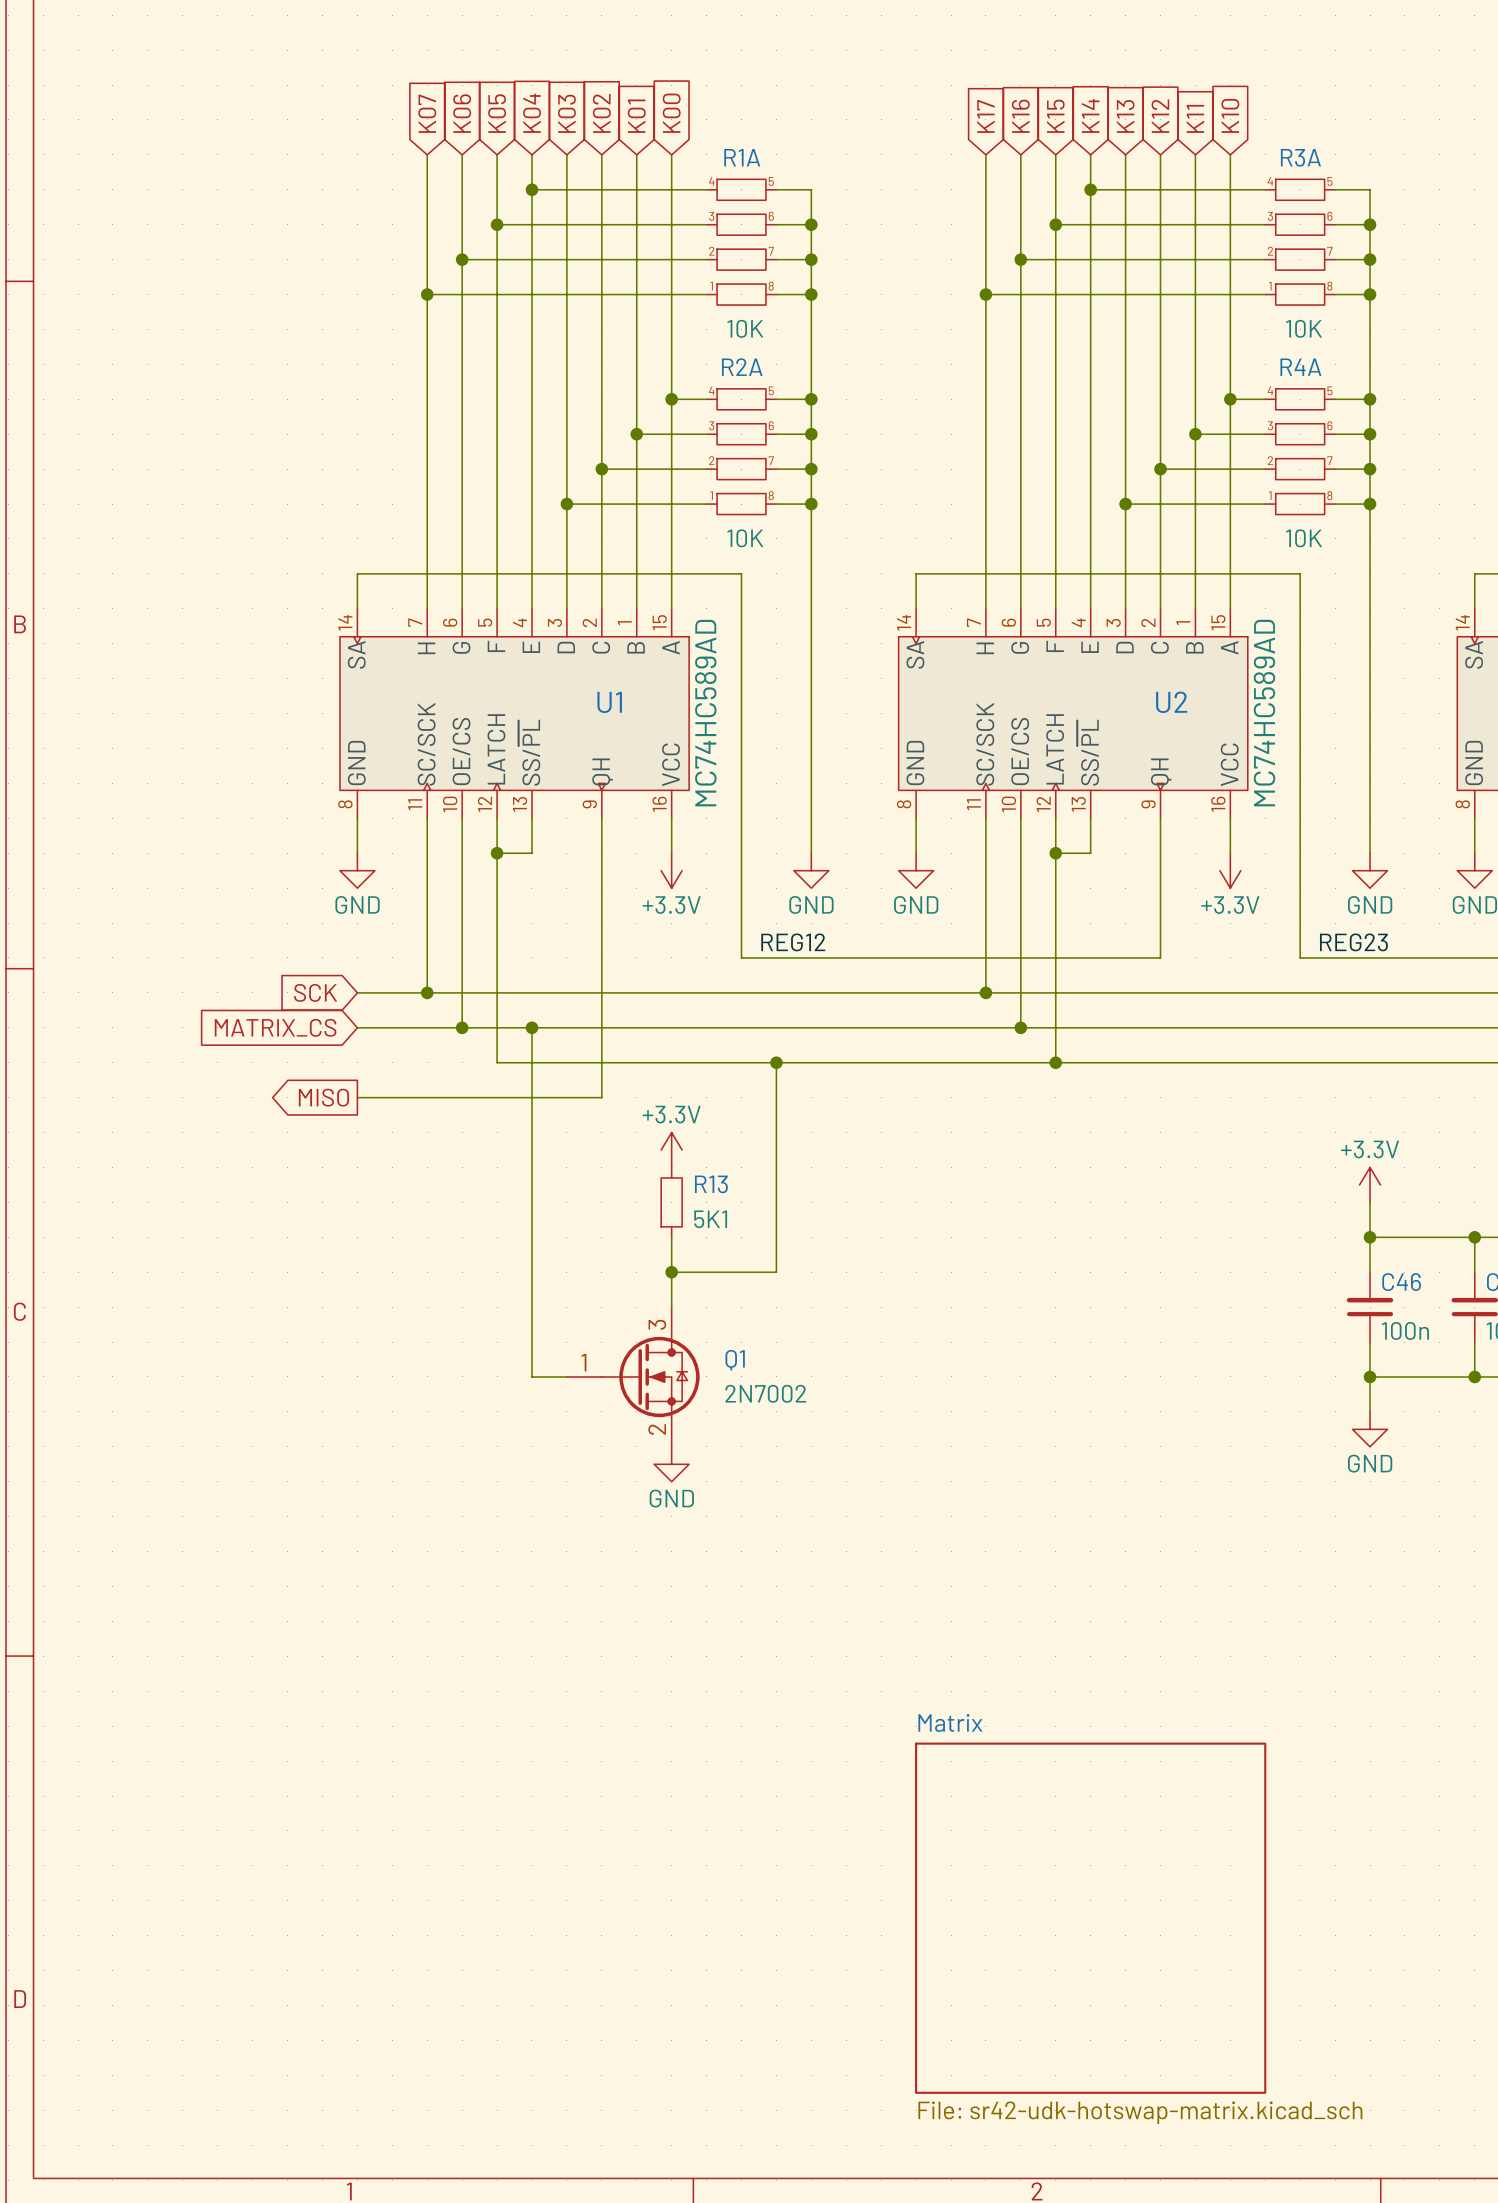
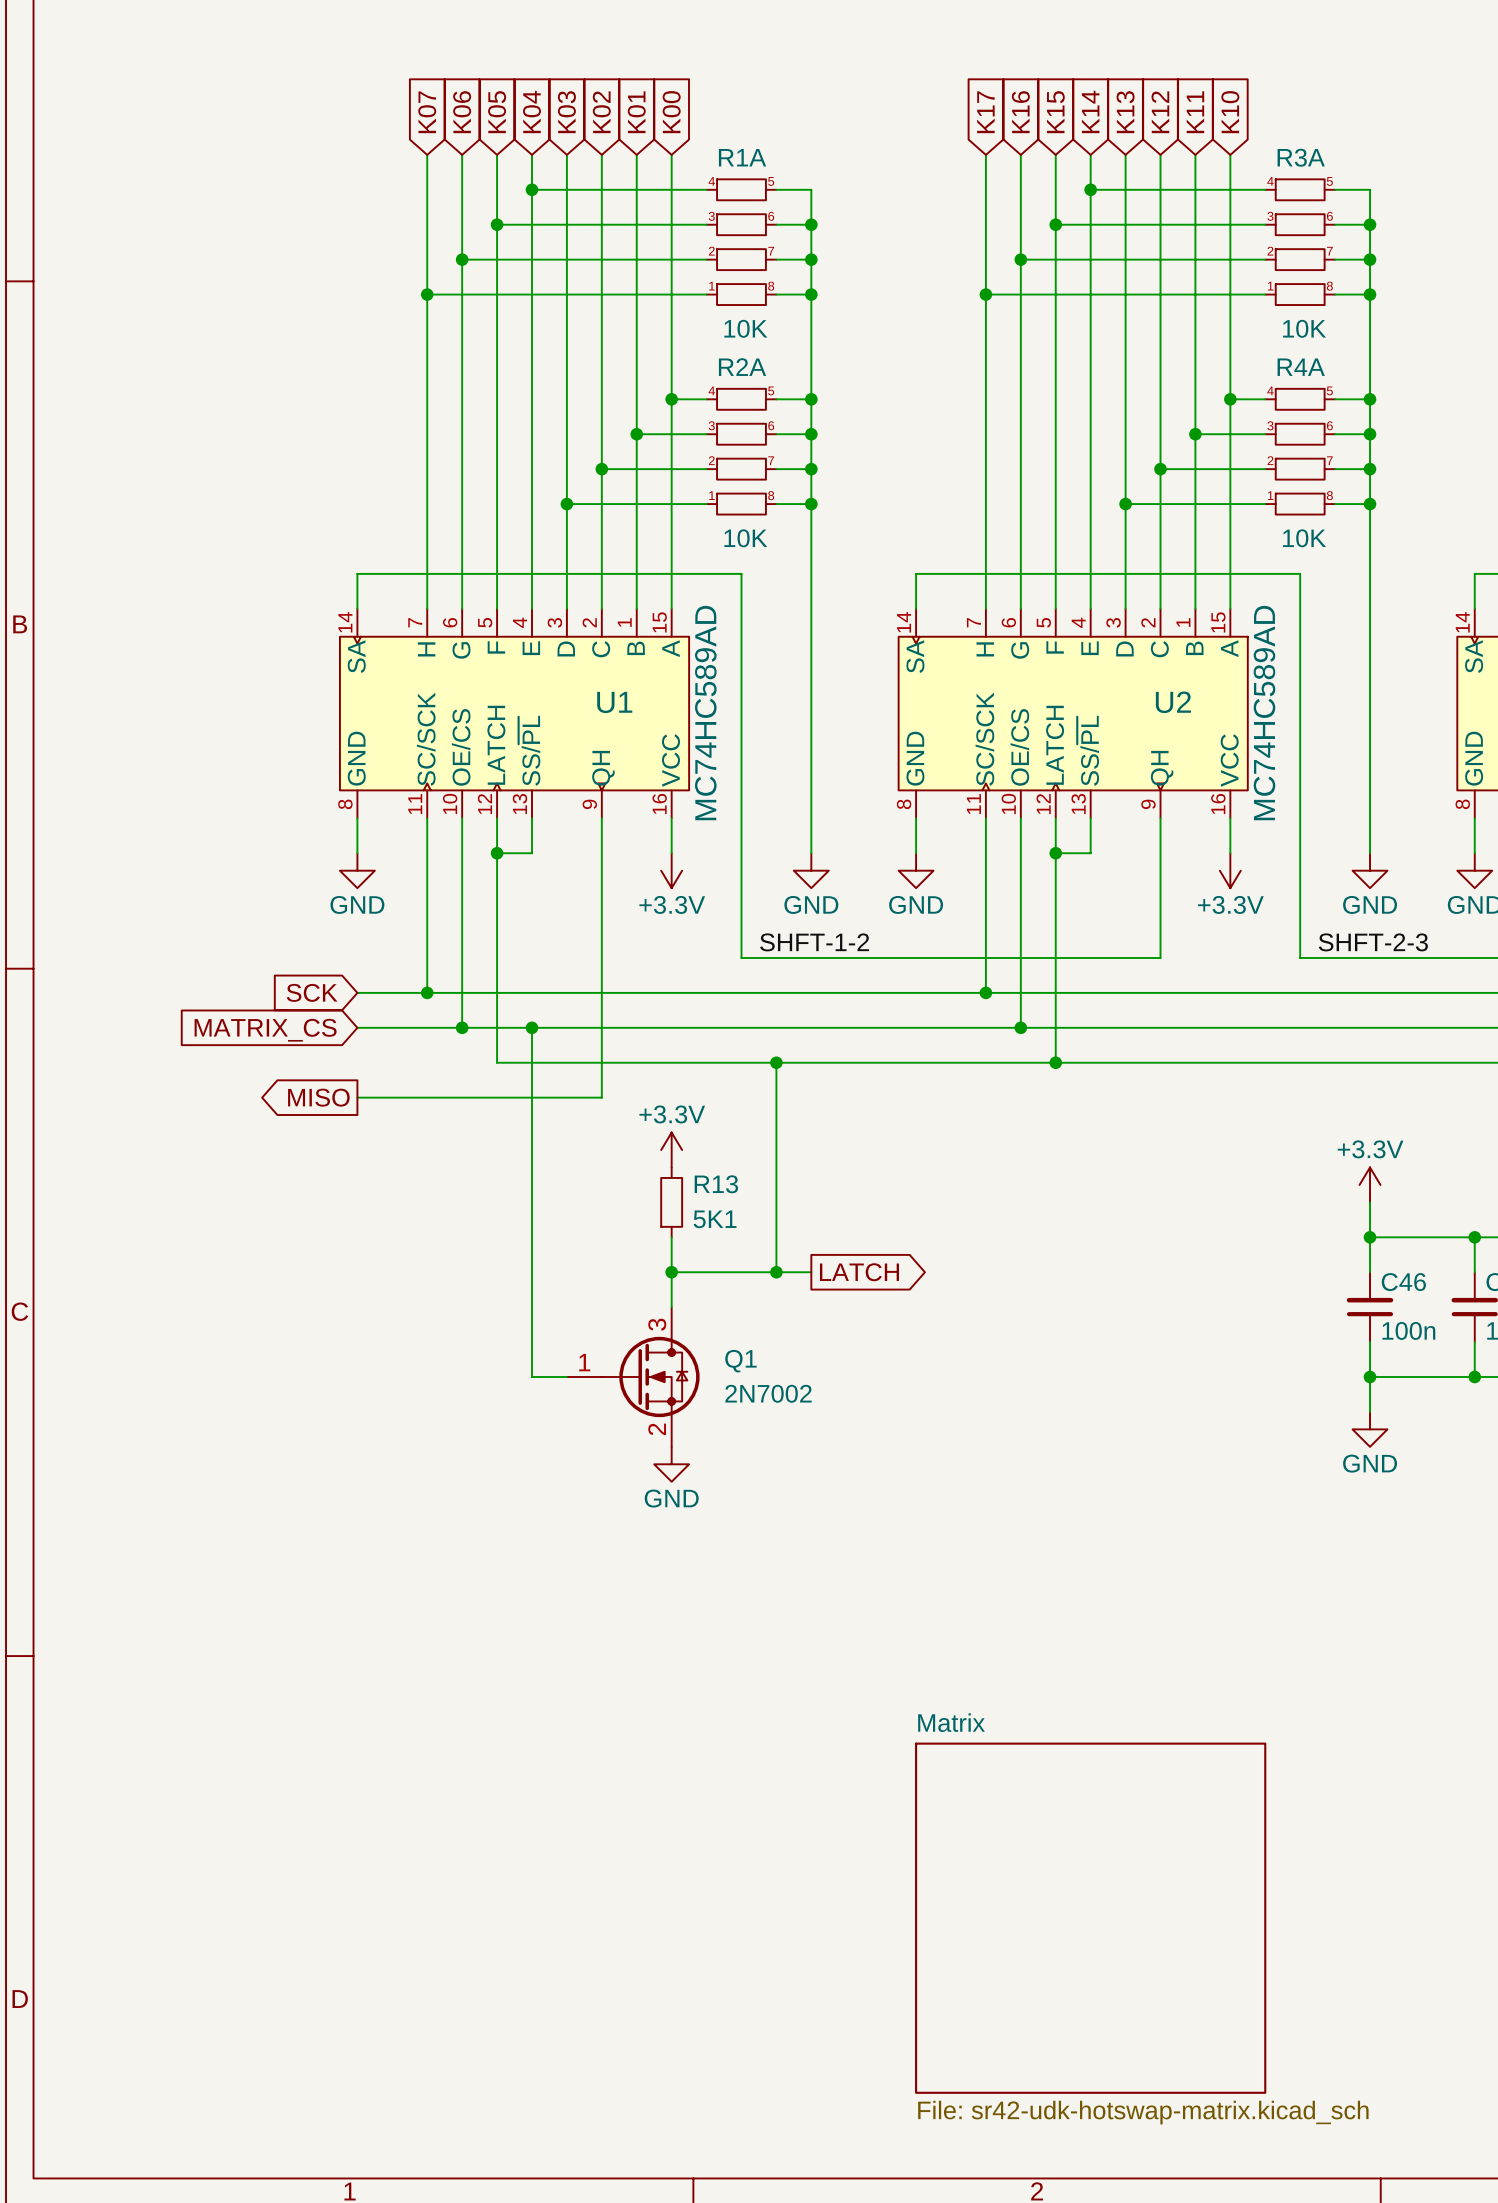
label: REG12 (793, 942) -> SHFT-1-2 (814, 942)
label: REG23 (1353, 942) -> SHFT-2-3 (1373, 942)
wire: none -> (776, 1272) (811, 1272)
junction: none -> (776, 1272)
global label: none -> LATCH (859, 1272)

